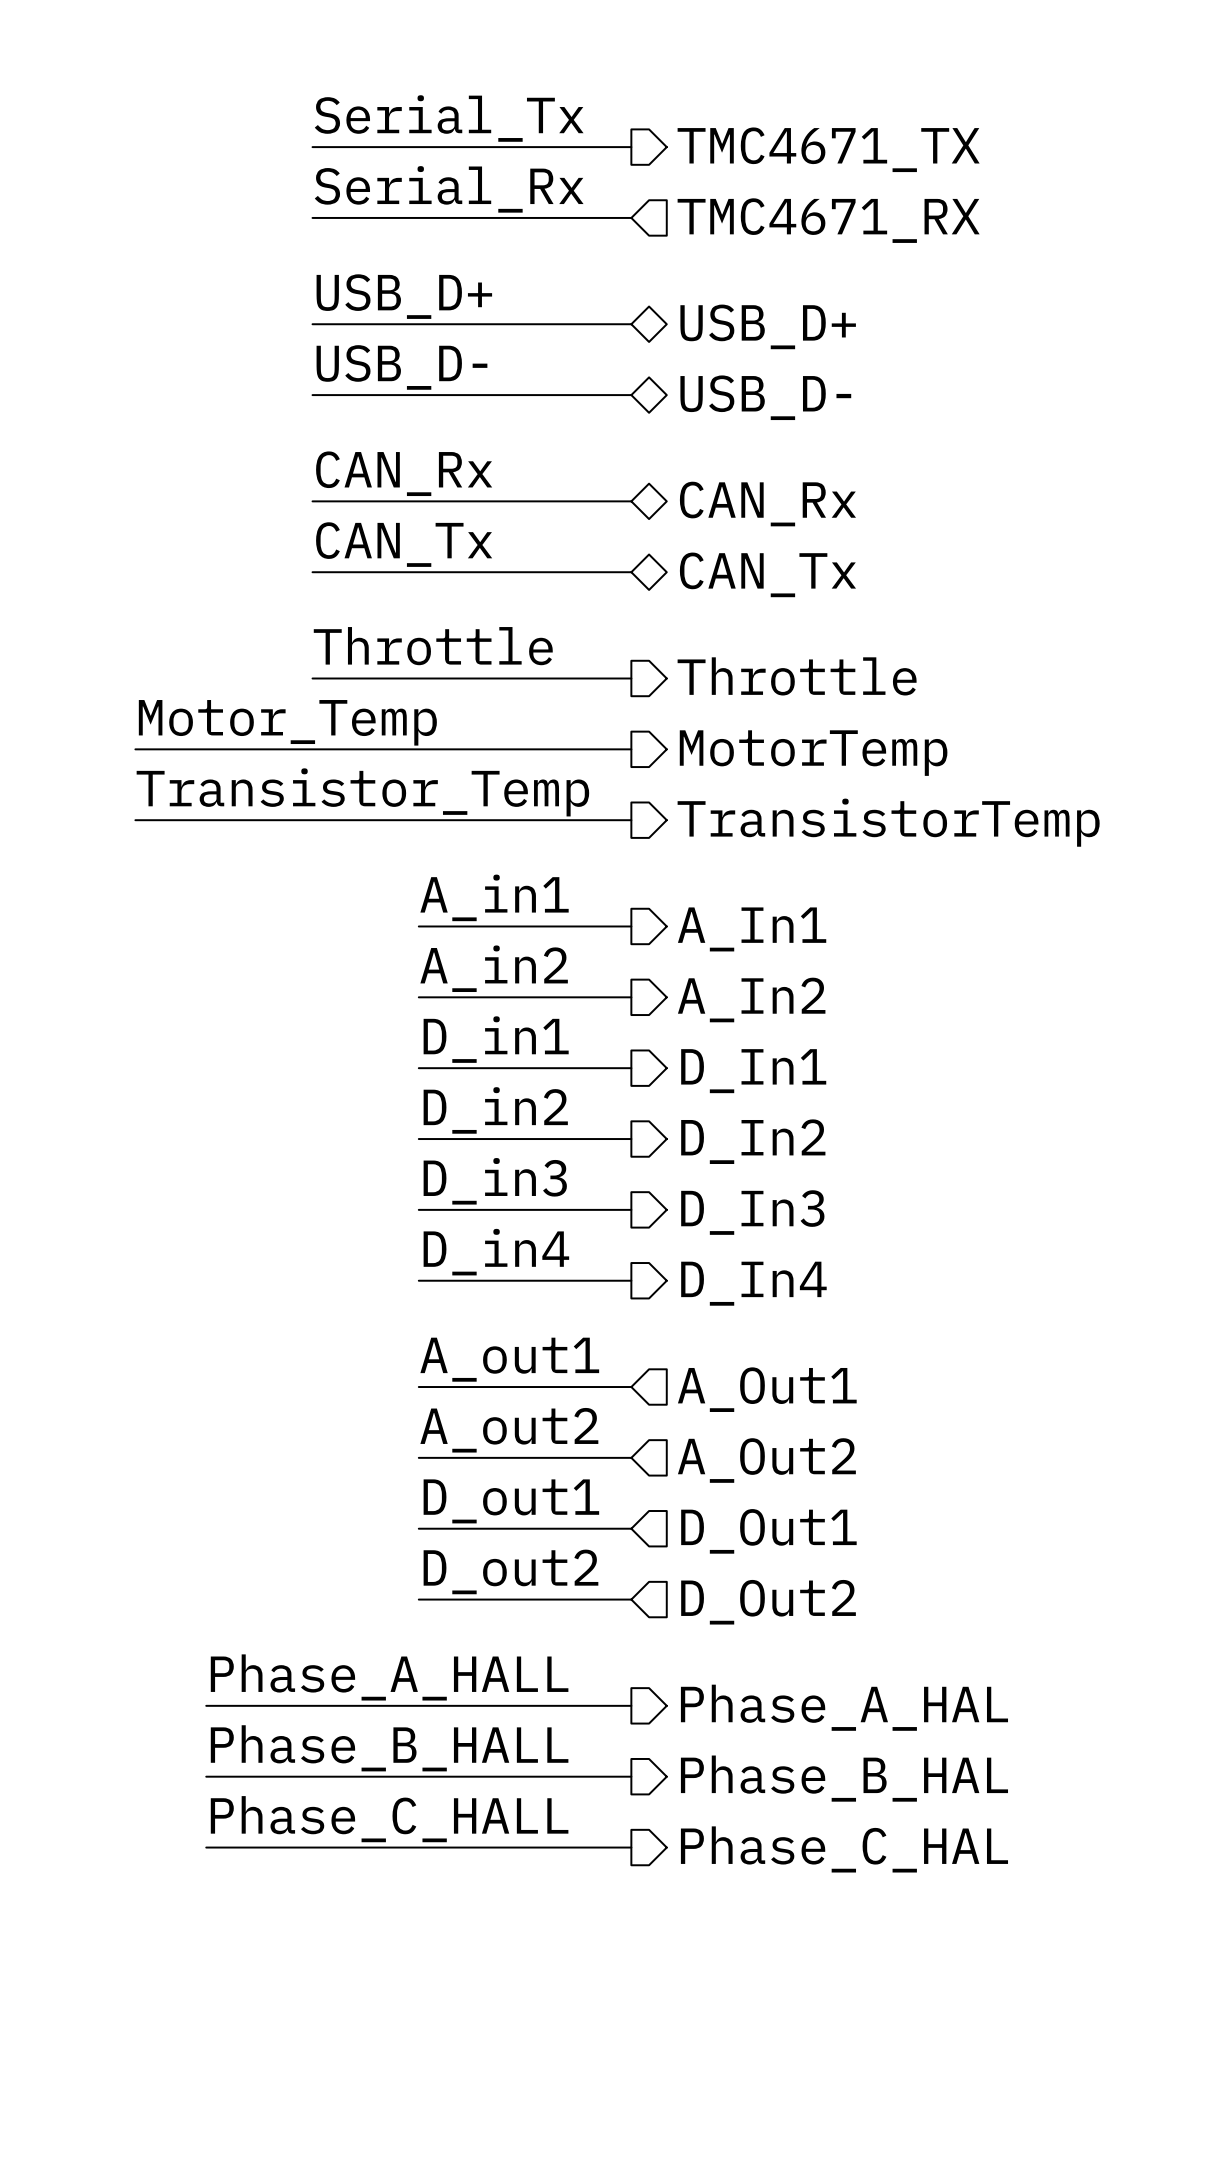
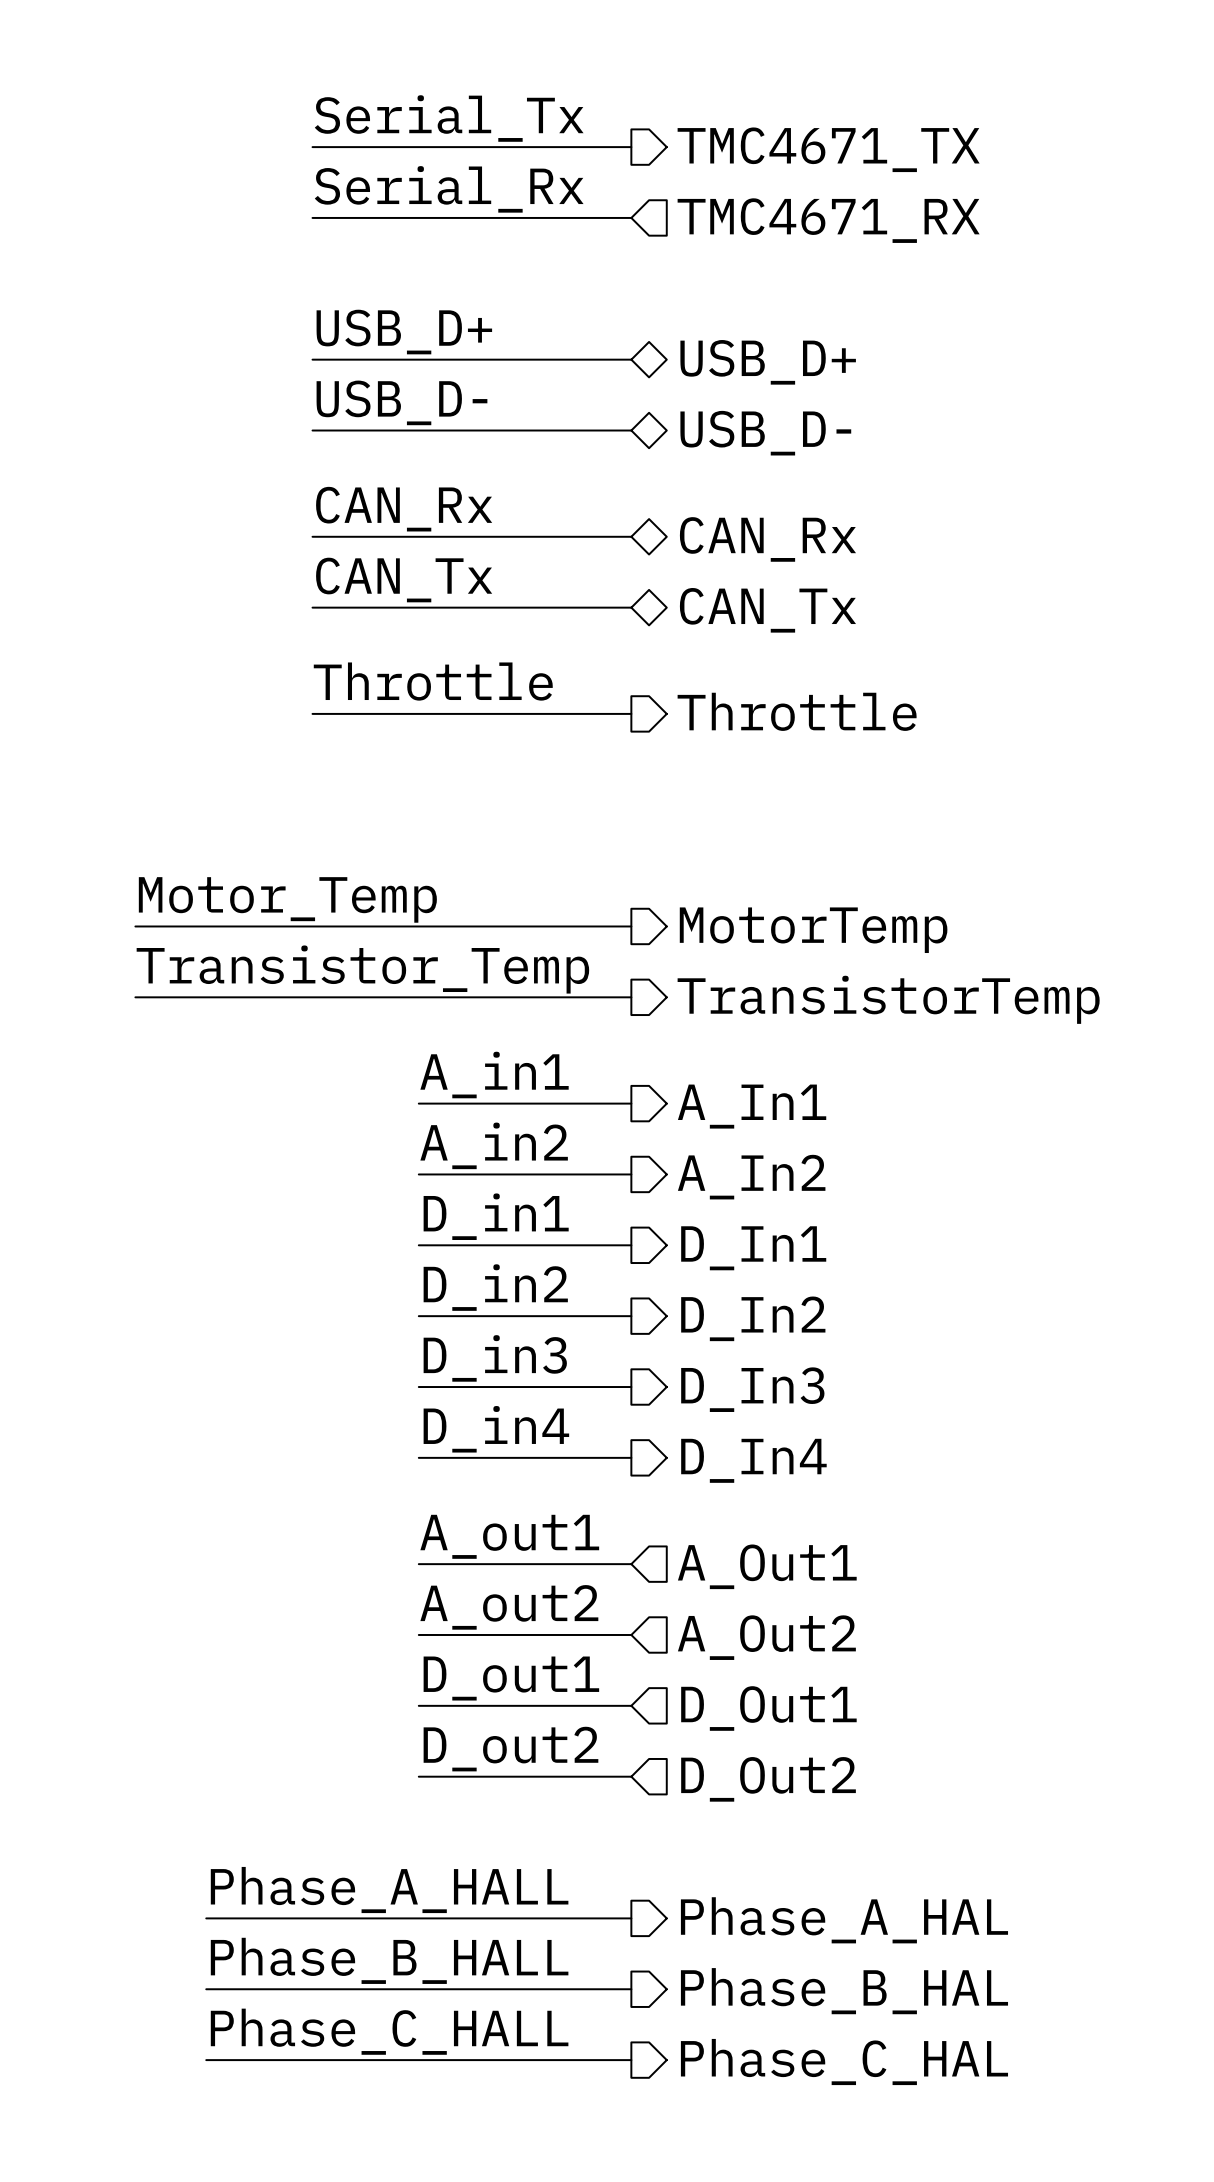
label position: USB_D+ (404, 296) -> USB_D+ (404, 332)
wire: (312, 324) (631, 324) -> (312, 359) (631, 359)
hierarchical label position: USB_D+ (768, 326) -> USB_D+ (768, 362)
label position: USB_D- (401, 367) -> USB_D- (401, 402)
wire: (312, 395) (631, 395) -> (312, 430) (631, 430)
hierarchical label position: USB_D- (765, 397) -> USB_D- (765, 433)
label position: CAN_Rx (404, 473) -> CAN_Rx (404, 509)
wire: (312, 501) (631, 501) -> (312, 536) (631, 536)
hierarchical label position: CAN_Rx (767, 504) -> CAN_Rx (767, 539)
label position: CAN_Tx (404, 544) -> CAN_Tx (404, 580)
wire: (312, 572) (631, 572) -> (312, 607) (631, 607)
hierarchical label position: CAN_Tx (767, 574) -> CAN_Tx (767, 610)
label position: Throttle (433, 646) -> Throttle (433, 681)
hierarchical label position: Throttle (797, 676) -> Throttle (797, 711)
wire: (312, 678) (631, 678) -> (312, 713) (631, 713)
label position: Motor_Temp (287, 722) -> Motor_Temp (287, 899)
wire: (135, 749) (631, 749) -> none
hierarchical label: MotorTemp (813, 753) -> none
label position: Transistor_Temp (362, 792) -> Transistor_Temp (362, 969)
wire: (135, 820) (631, 820) -> none
hierarchical label: TransistorTemp (888, 822) -> none
label position: A_in1 (494, 897) -> A_in1 (494, 1075)
wire: none -> (135, 926) (418, 926)
hierarchical label: A_In1 (752, 929) -> MotorTemp (813, 930)
label position: A_in2 (494, 968) -> A_in2 (494, 1145)
wire: none -> (135, 997) (418, 997)
hierarchical label: A_In2 (751, 999) -> TransistorTemp (888, 999)
label position: D_in1 (496, 1039) -> D_in1 (496, 1216)
wire: (418, 1068) (631, 1068) -> (418, 1103) (631, 1103)
hierarchical label position: D_In1 (753, 1071) -> D_In1 (753, 1248)
hierarchical label: none -> A_In1 (752, 1106)
label position: D_in2 (495, 1110) -> D_in2 (495, 1287)
wire: (418, 1139) (631, 1139) -> (418, 1174) (631, 1174)
hierarchical label position: D_In2 (753, 1141) -> D_In2 (753, 1318)
hierarchical label: none -> A_In2 (751, 1177)
label: D_in3 (495, 1181) -> none
wire: (418, 1209) (631, 1209) -> (418, 1245) (631, 1245)
hierarchical label: D_In3 (752, 1212) -> none
label: D_in4 (496, 1252) -> none
wire: (418, 1280) (631, 1280) -> (418, 1316) (631, 1316)
hierarchical label: D_In4 (753, 1283) -> none
label: A_out1 (509, 1359) -> D_in3 (495, 1358)
hierarchical label shape: input (767, 1389) -> output (752, 1389)
hierarchical label: A_Out1 (767, 1389) -> D_In3 (752, 1389)
label: A_out2 (509, 1430) -> D_in4 (496, 1429)
hierarchical label shape: input (766, 1460) -> output (753, 1460)
hierarchical label: A_Out2 (766, 1460) -> D_In4 (753, 1460)
label position: D_out1 (511, 1501) -> D_out1 (511, 1678)
wire: (418, 1528) (631, 1528) -> (418, 1564) (631, 1564)
hierarchical label: D_Out1 (768, 1531) -> none
label: none -> A_out1 (509, 1536)
hierarchical label: none -> A_Out1 (767, 1566)
label position: D_out2 (510, 1571) -> D_out2 (510, 1749)
wire: (418, 1599) (631, 1599) -> (418, 1634) (631, 1634)
hierarchical label: D_Out2 (768, 1602) -> none
label: none -> A_out2 (509, 1607)
hierarchical label: none -> A_Out2 (766, 1637)
label position: Phase_A_HALL (389, 1677) -> Phase_A_HALL (389, 1890)
wire: (206, 1705) (418, 1705) -> none
hierarchical label shape: output (844, 1707) -> input (768, 1708)
hierarchical label: Phase_A_HAL (844, 1707) -> D_Out1 (768, 1708)
label position: Phase_B_HALL (389, 1748) -> Phase_B_HALL (389, 1960)
wire: (206, 1776) (418, 1776) -> none
hierarchical label shape: output (844, 1778) -> input (768, 1779)
hierarchical label: Phase_B_HAL (844, 1778) -> D_Out2 (768, 1779)
label position: Phase_C_HALL (389, 1819) -> Phase_C_HALL (389, 2031)
wire: (206, 1847) (631, 1847) -> (206, 2060) (631, 2060)
hierarchical label position: Phase_C_HAL (844, 1849) -> Phase_C_HAL (844, 2062)
wire: none -> (206, 1918) (631, 1918)
hierarchical label: none -> Phase_A_HAL (844, 1920)
wire: none -> (206, 1989) (631, 1989)
hierarchical label: none -> Phase_B_HAL (844, 1991)

